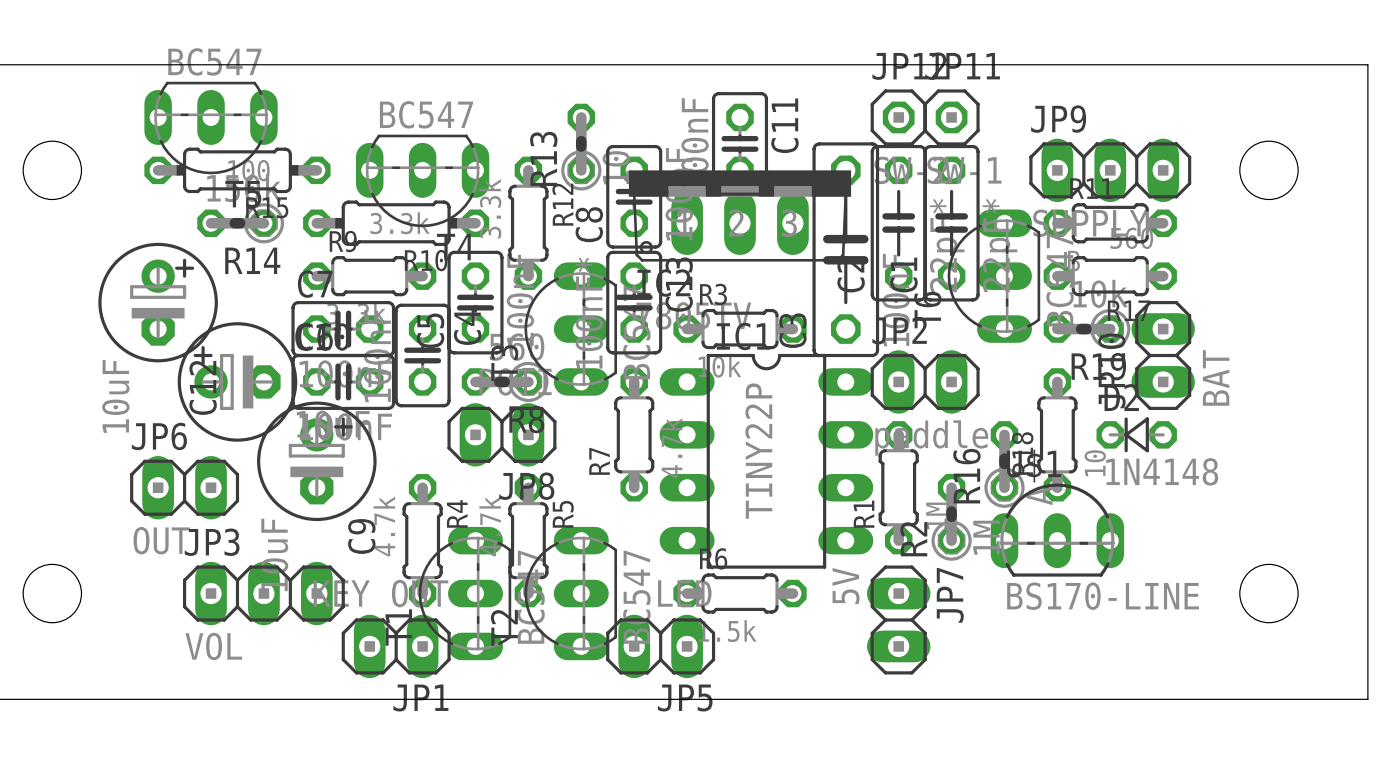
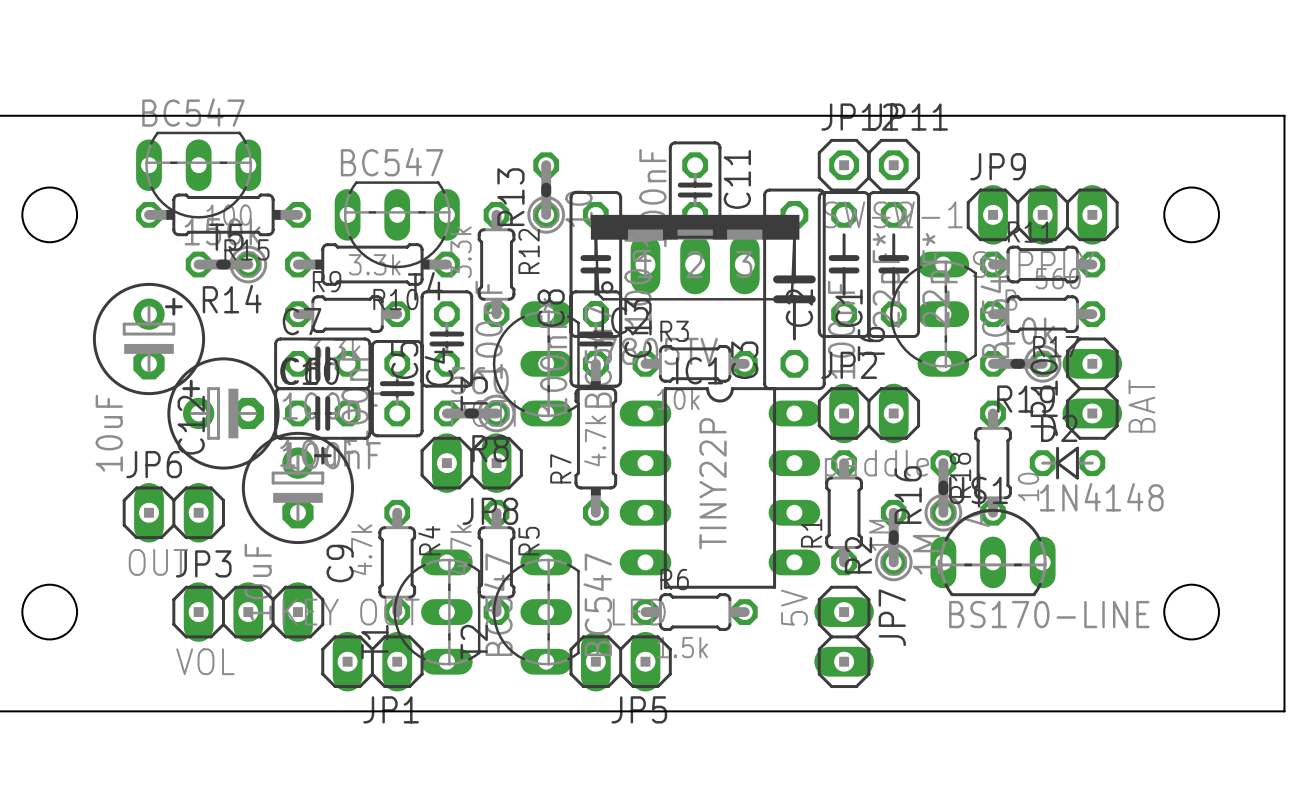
C8 footprint: [606, 144, 663, 249] -> [569, 191, 623, 339]
R7 footprint: [614, 368, 655, 502] -> [574, 350, 618, 526]

